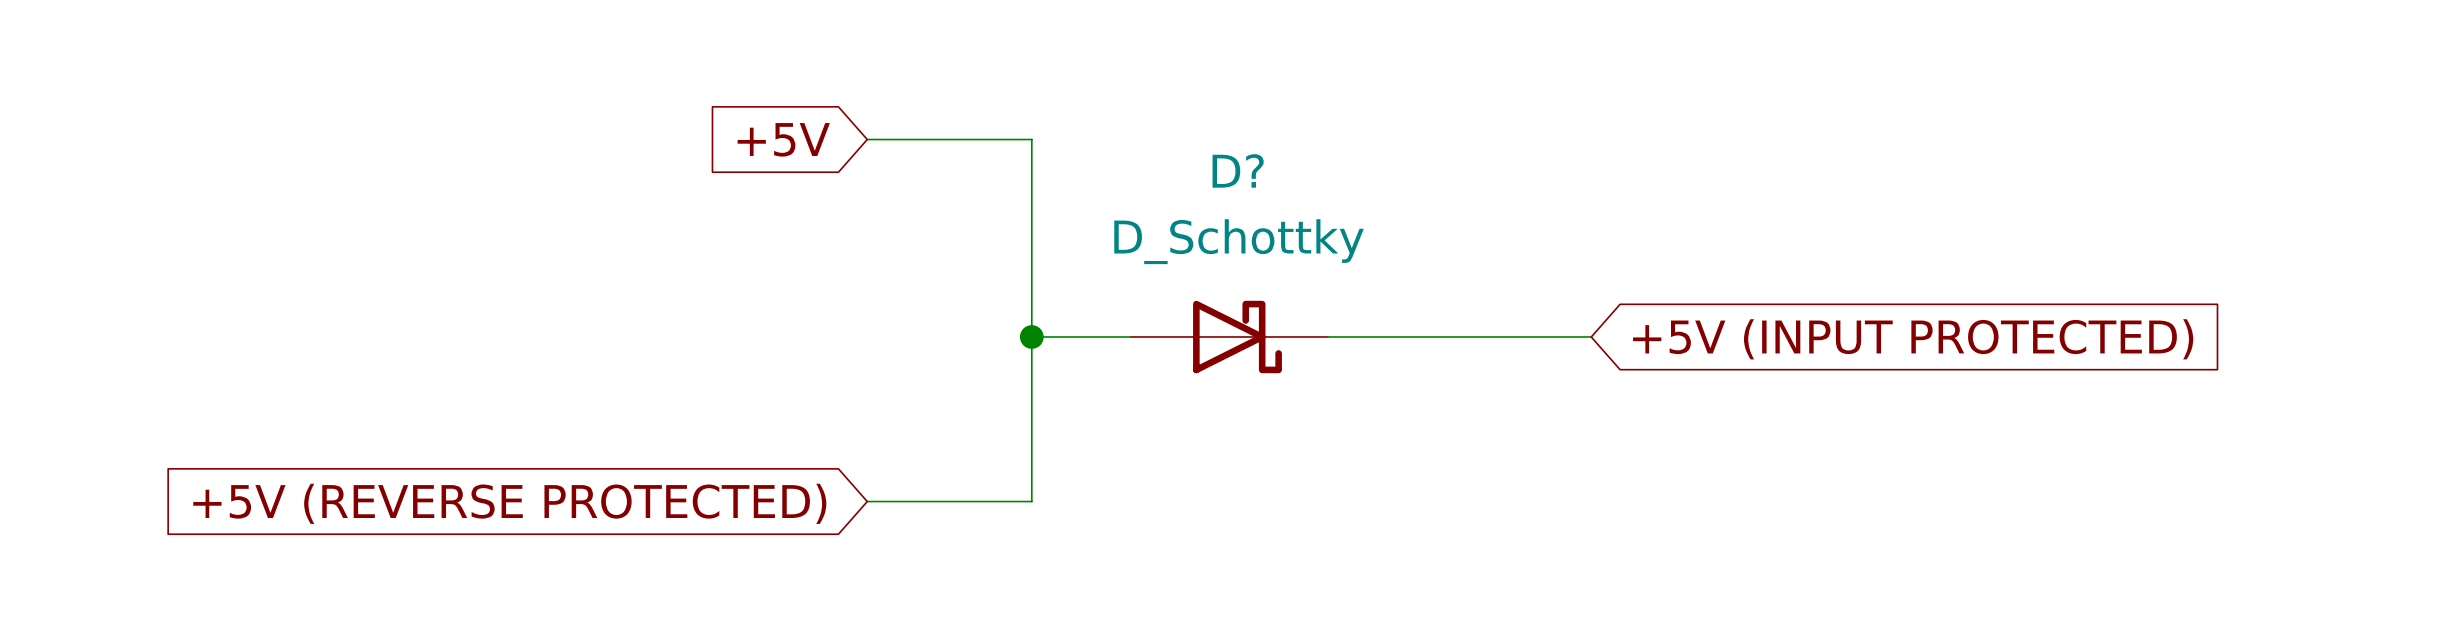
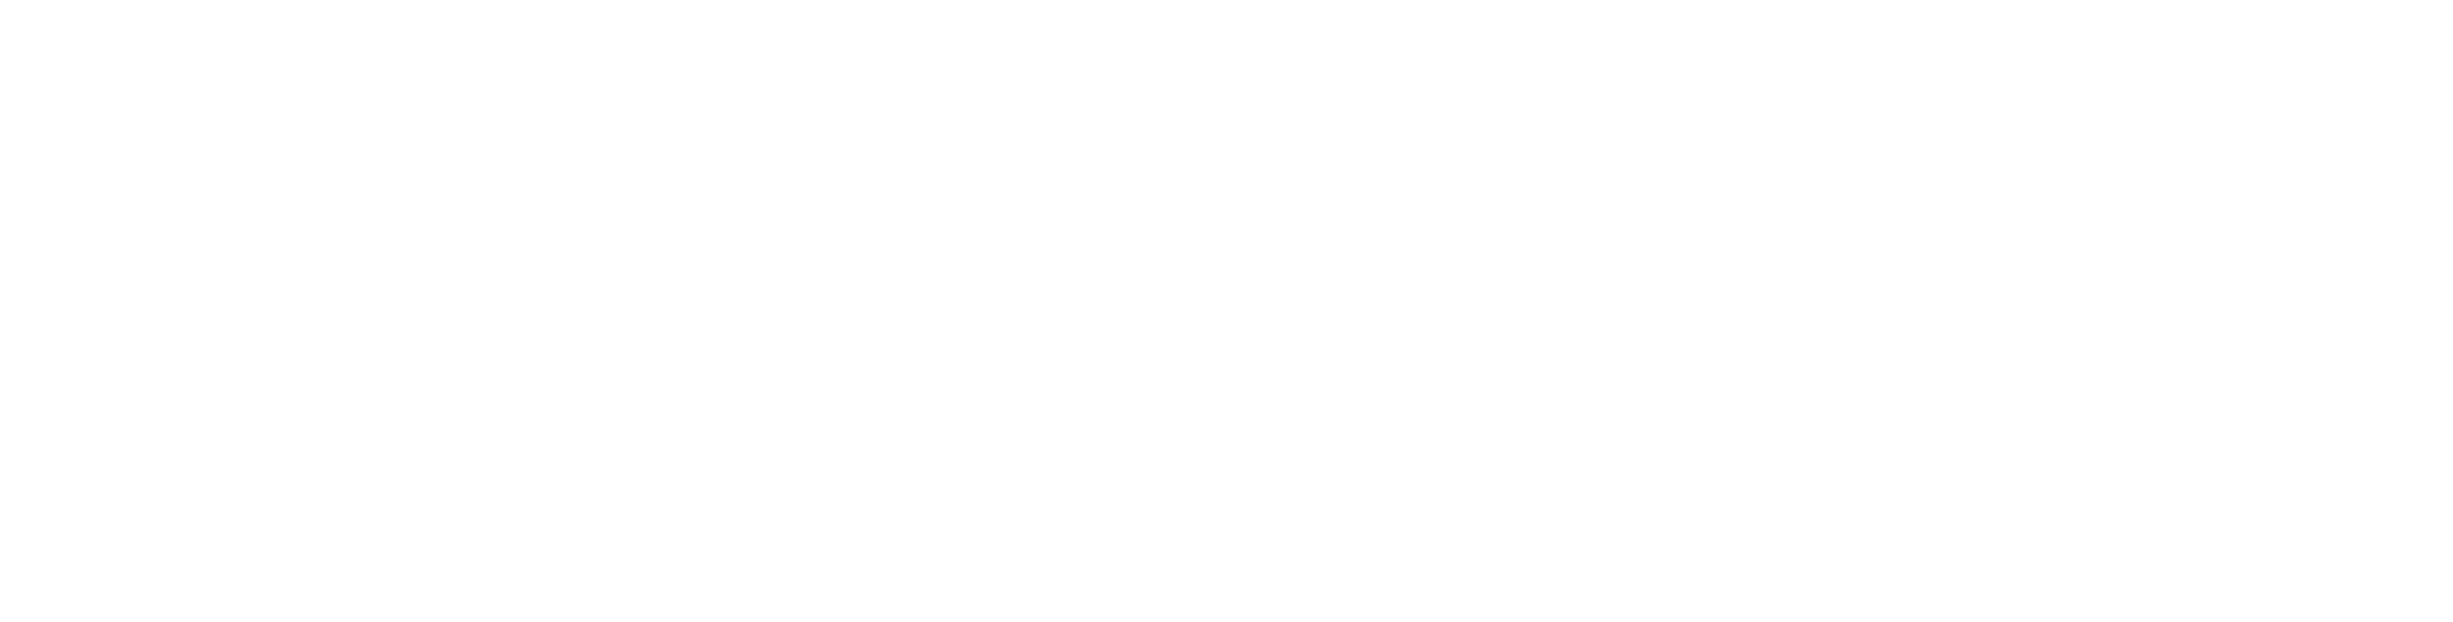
global label: +5V (783, 139) -> none
wire: (867, 139) (1031, 139) (1031, 501) (867, 501) -> none
wire: (1031, 336) (1130, 336) -> none
junction: (1031, 336) -> none
D?: D_Schottky (1229, 336) -> none
wire: (1328, 336) (1591, 336) -> none
global label: +5V (INPUT PROTECTED) (1913, 339) -> none
global label: +5V (REVERSE PROTECTED) (509, 503) -> none

